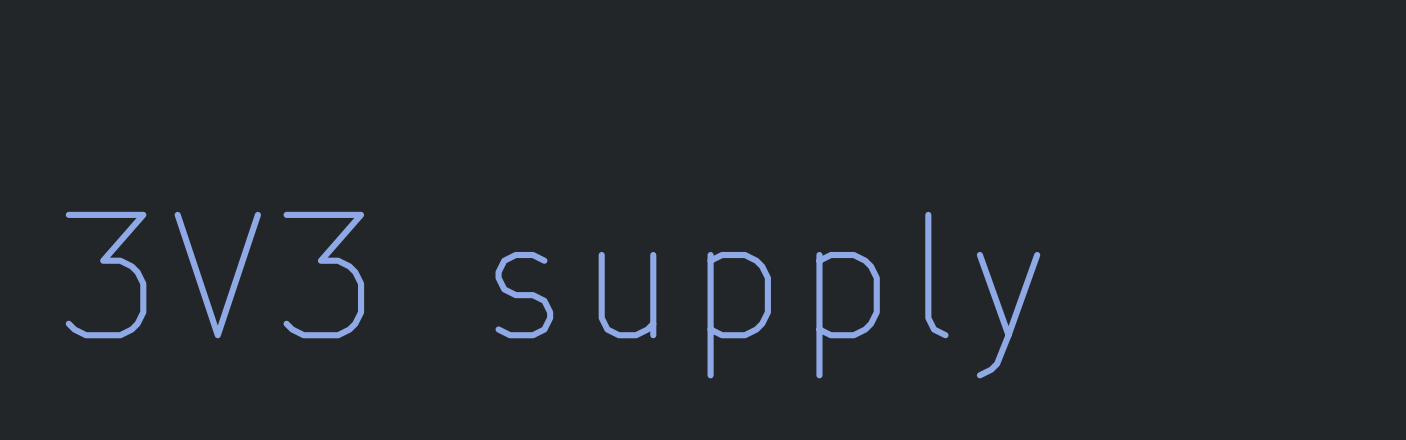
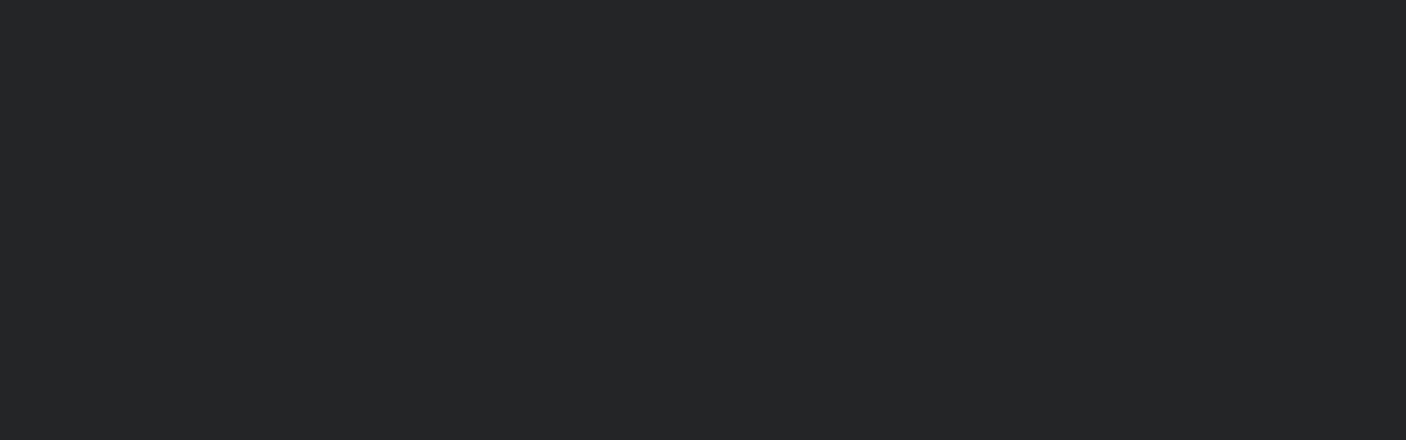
text: 3V3 supply (553, 295) -> none

